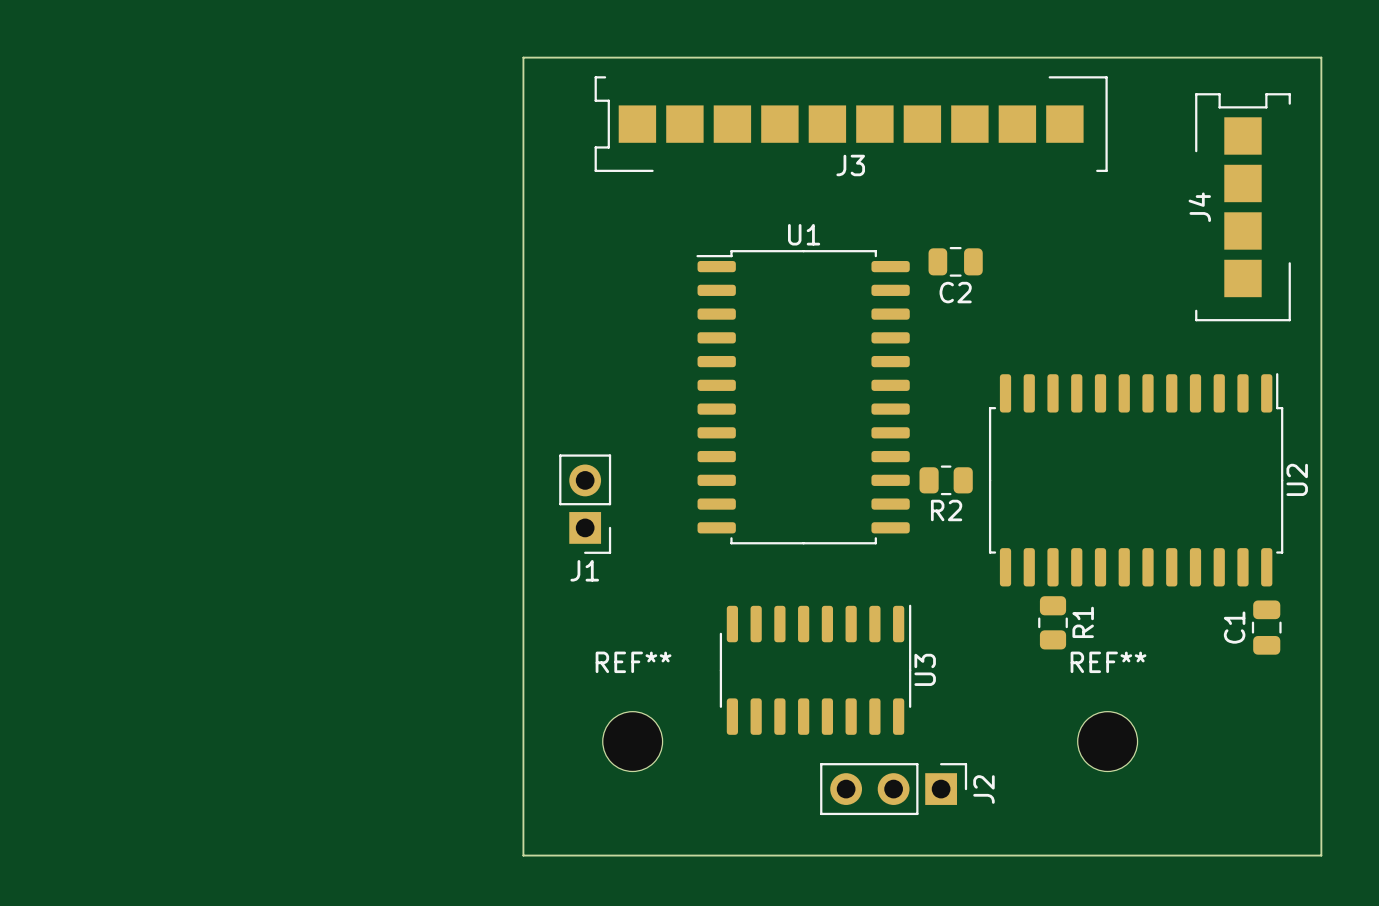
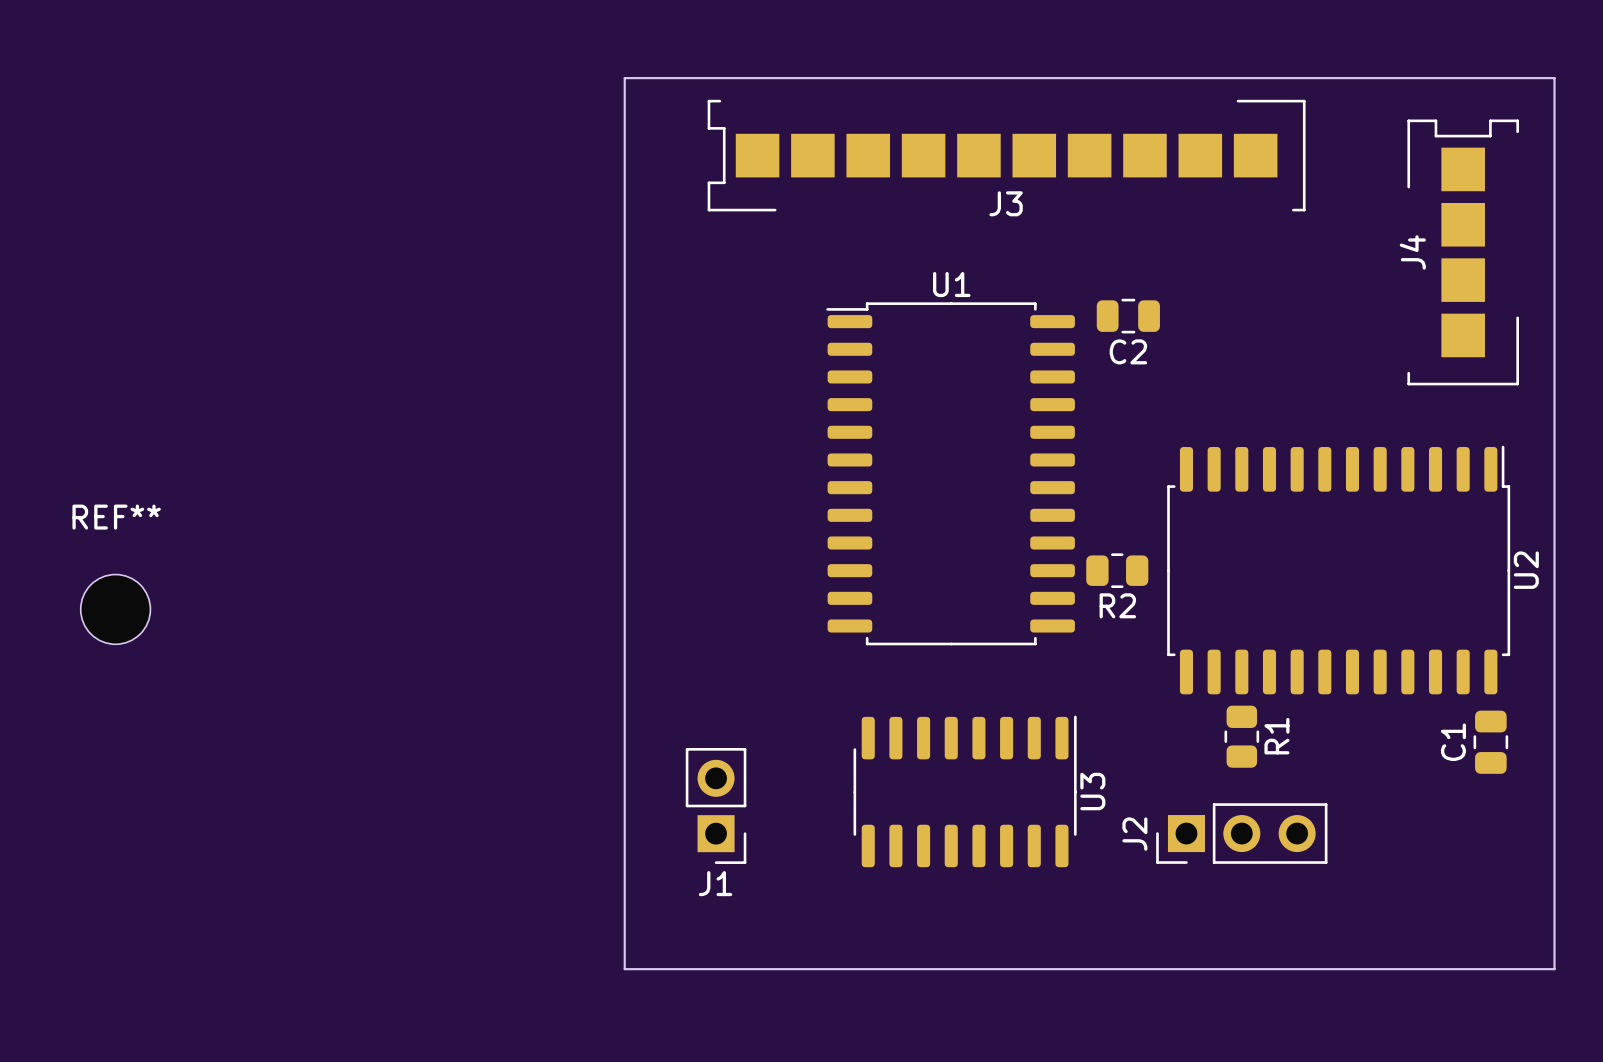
J1 position: (585, 504) -> (716, 805)
REF**: none -> (115, 609)
REF**: (632, 741) -> none
REF**: (1107, 741) -> none
J2 rotation: 0° (893, 789) -> 180° (1241, 833)
J2 position: (893, 789) -> (1241, 833)
board edge: (523, 822) (523, 855) (1321, 855) (1321, 822) -> (624, 969) (1554, 969)

